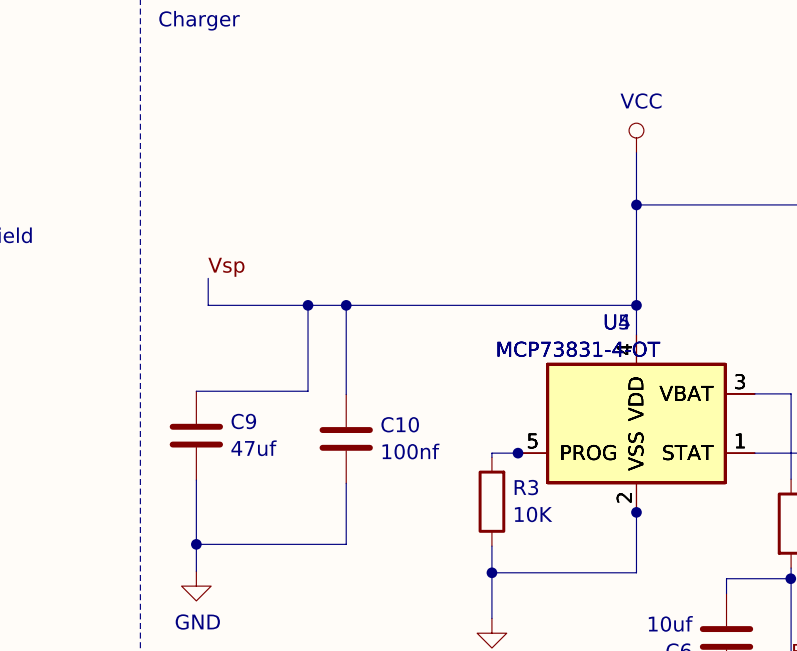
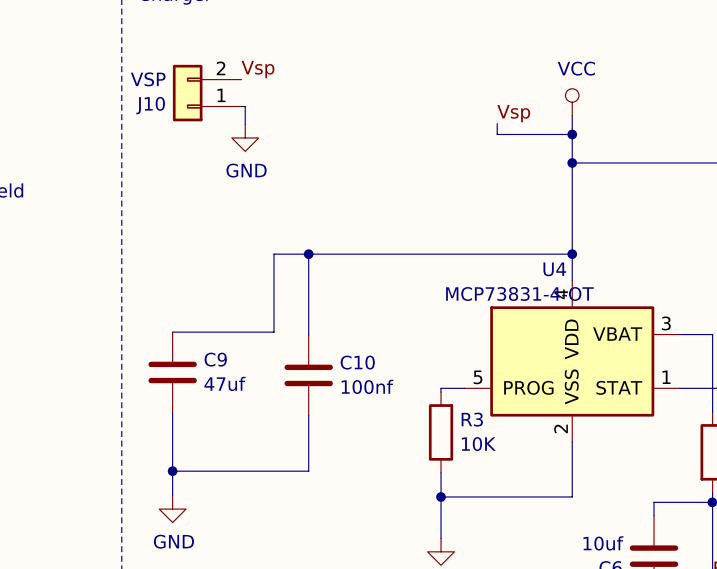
J10: none -> VSP (207, 93)
wire: none -> (241, 106) (245, 106) (245, 124)
label: none -> Vsp (513, 113)
wire: none -> (497, 123) (497, 134) (572, 134)
junction: none -> (572, 134)
power symbol: none -> GND (245, 137)
label position: Vsp (226, 267) -> Vsp (258, 69)
wire: (208, 278) (208, 305) (308, 305) -> none
junction: (308, 305) -> none
part: MCP73831-4-OT (636, 423) -> none
junction: (518, 453) -> none
junction: (636, 512) -> none

